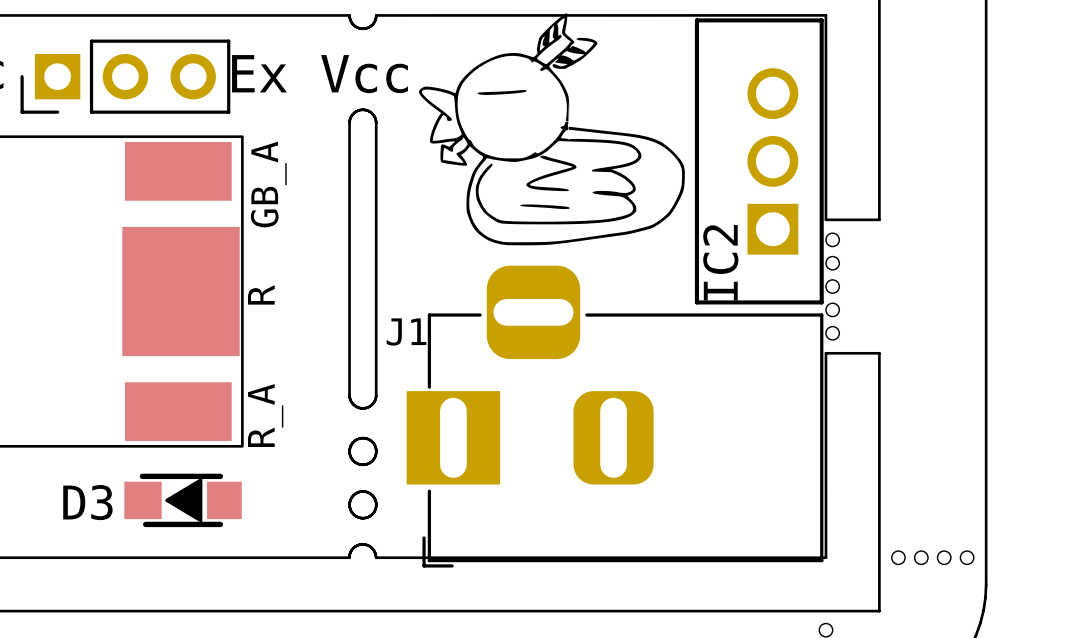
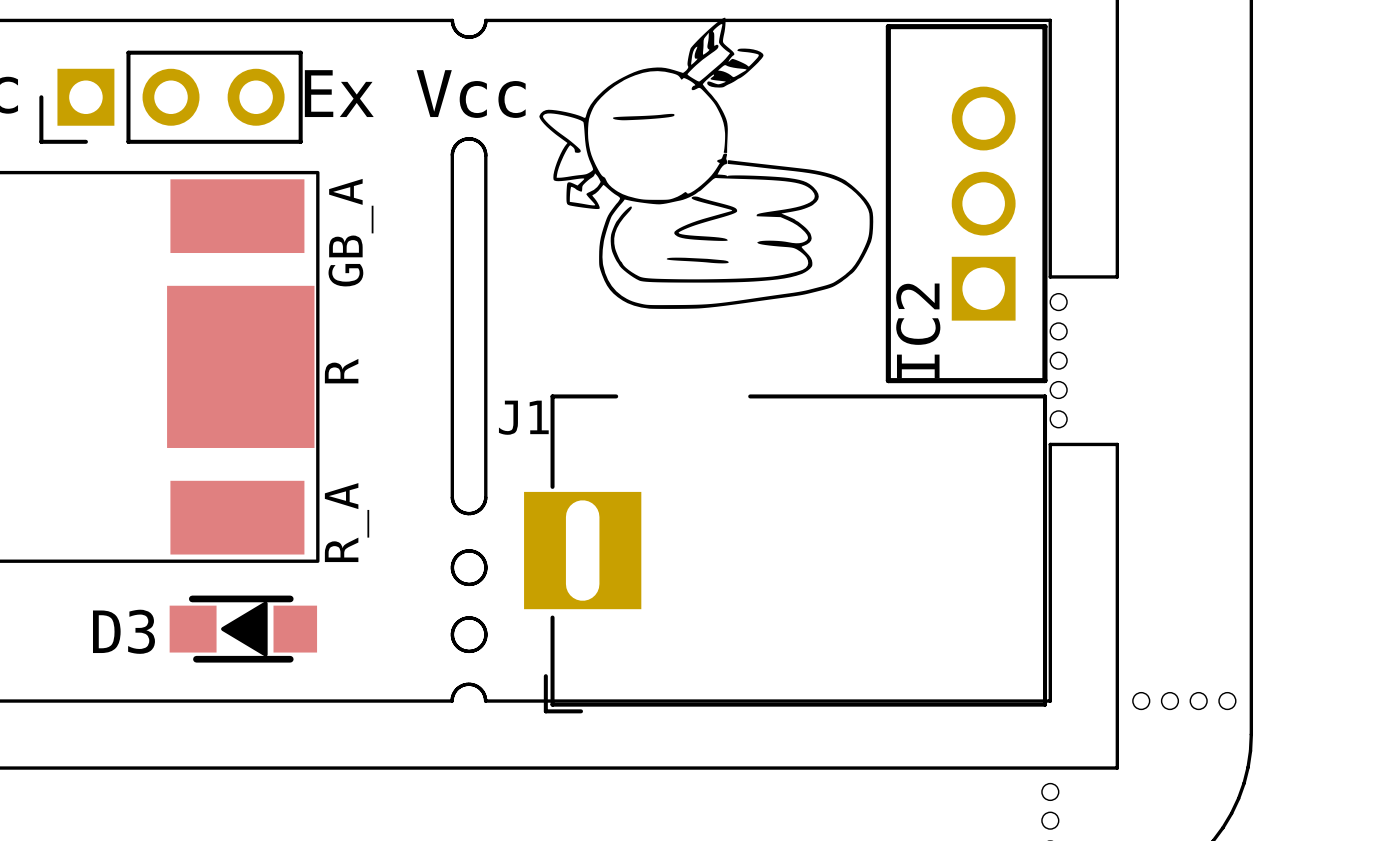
J1 footprint: [406, 265, 824, 568] -> [524, 376, 1048, 714]

